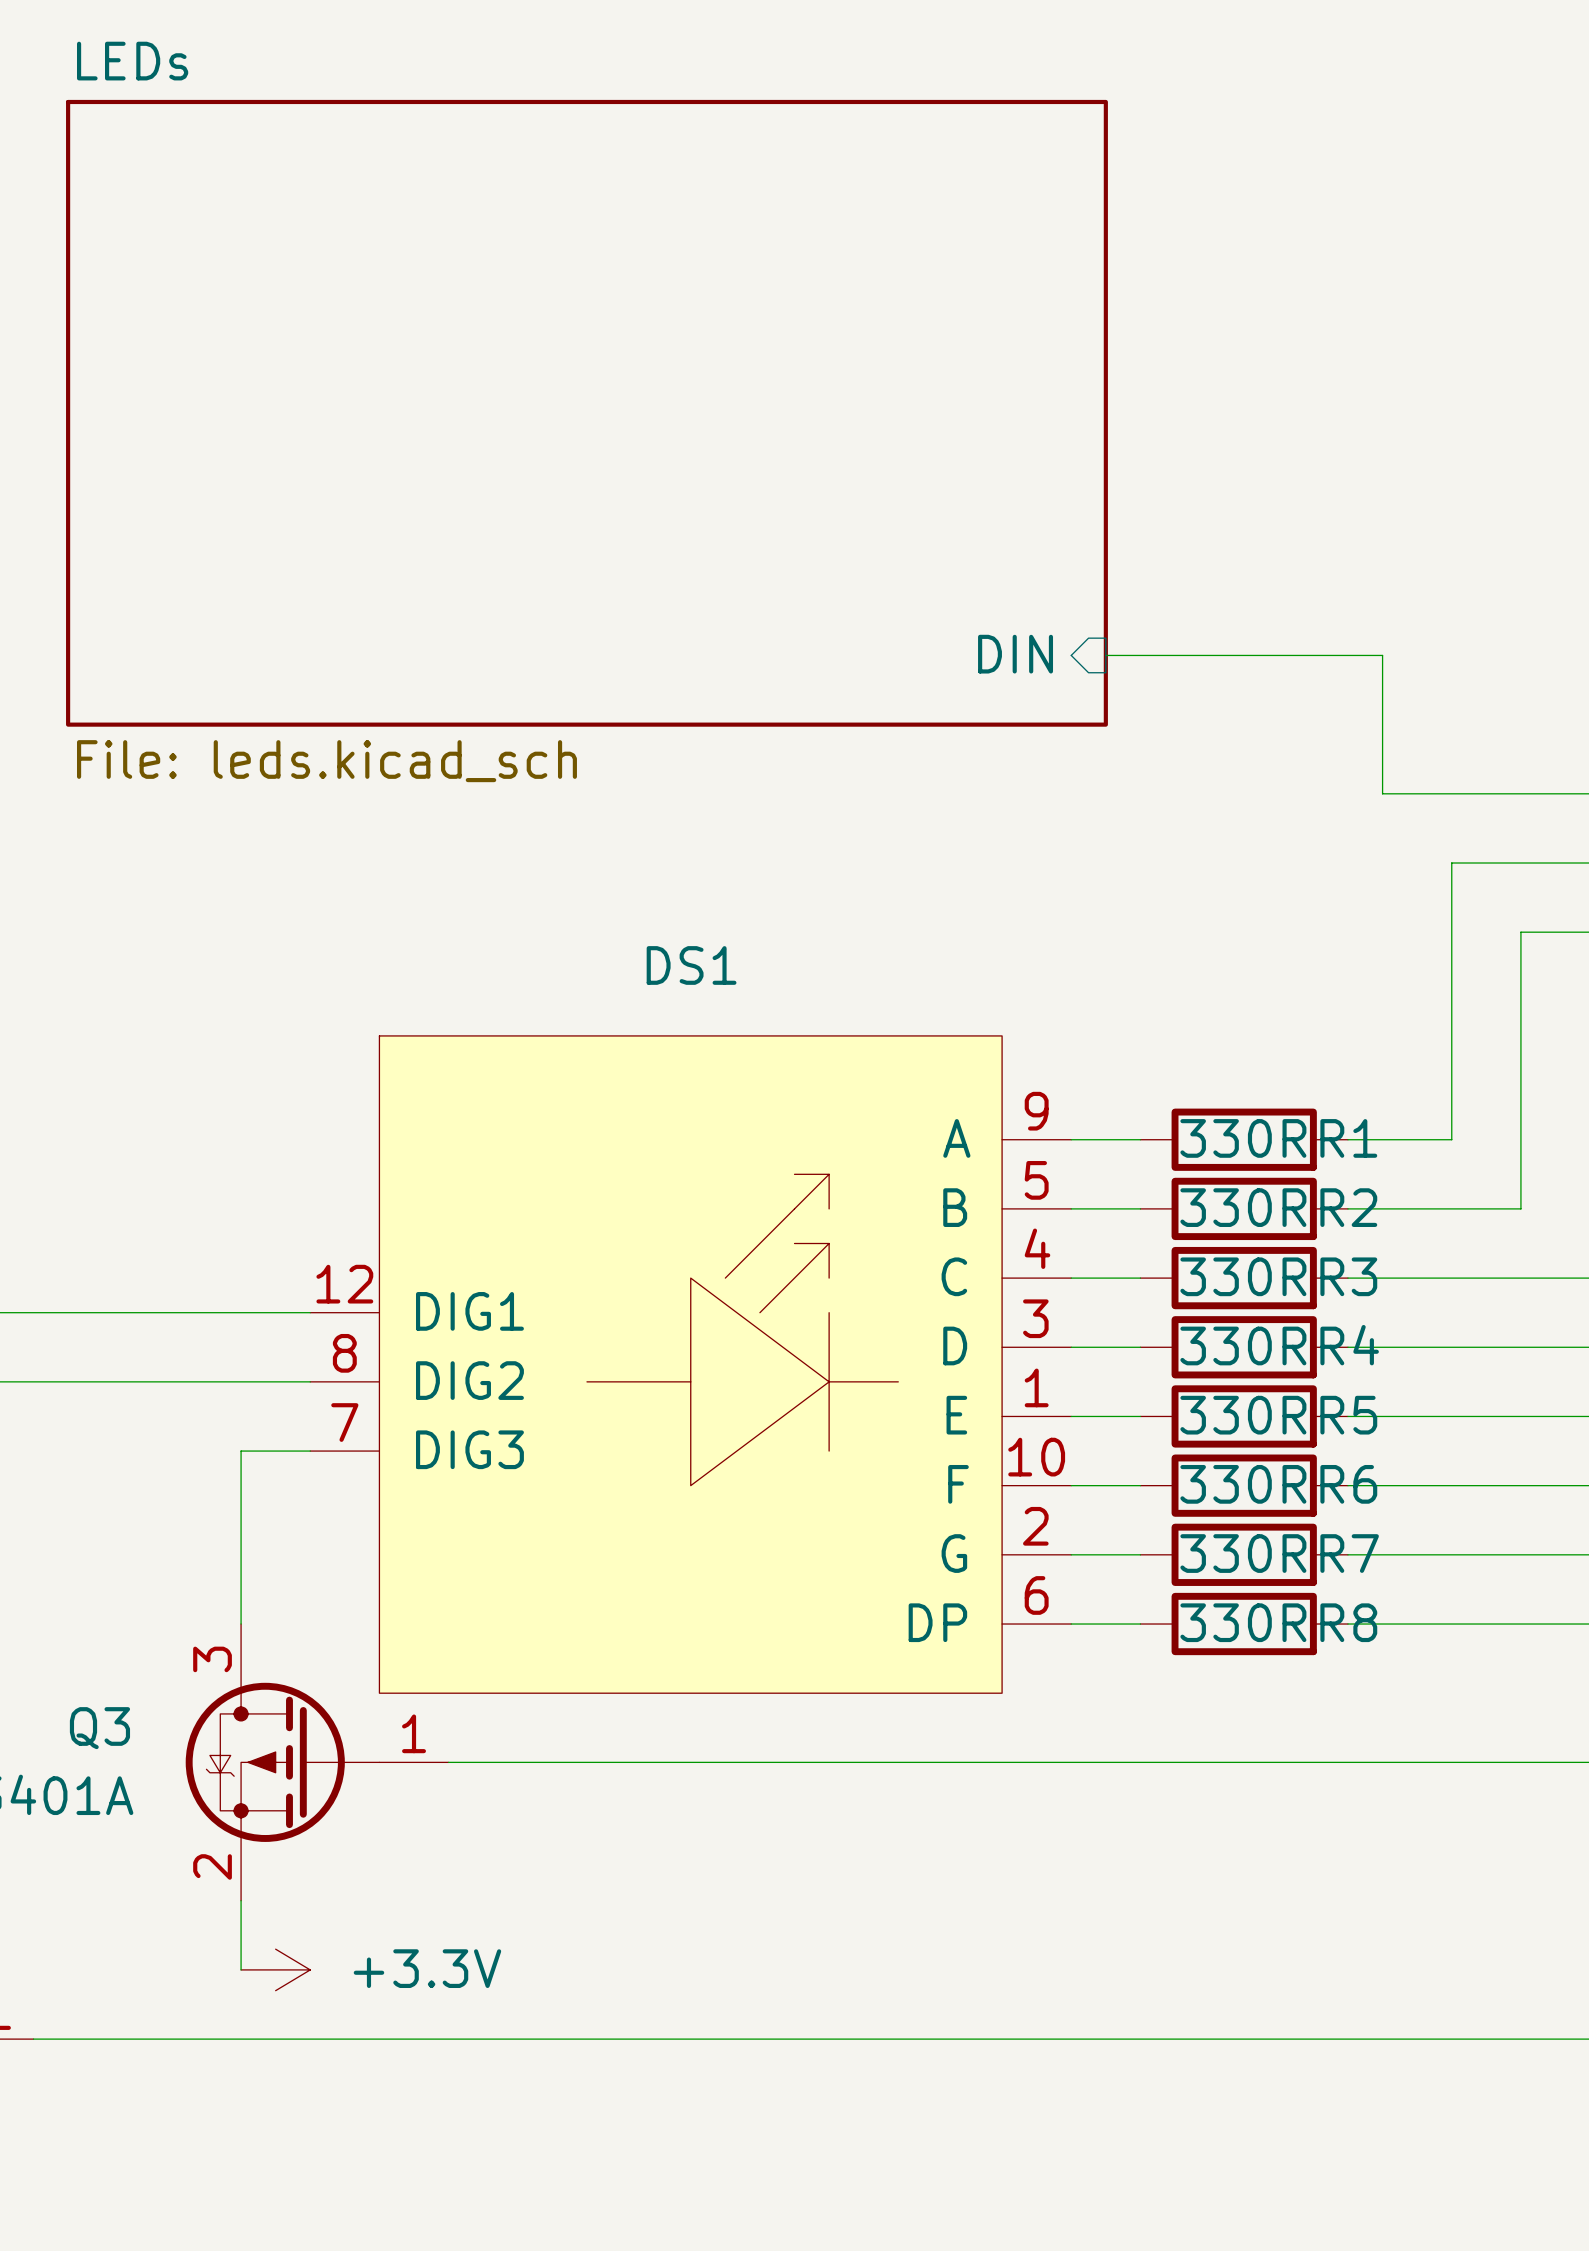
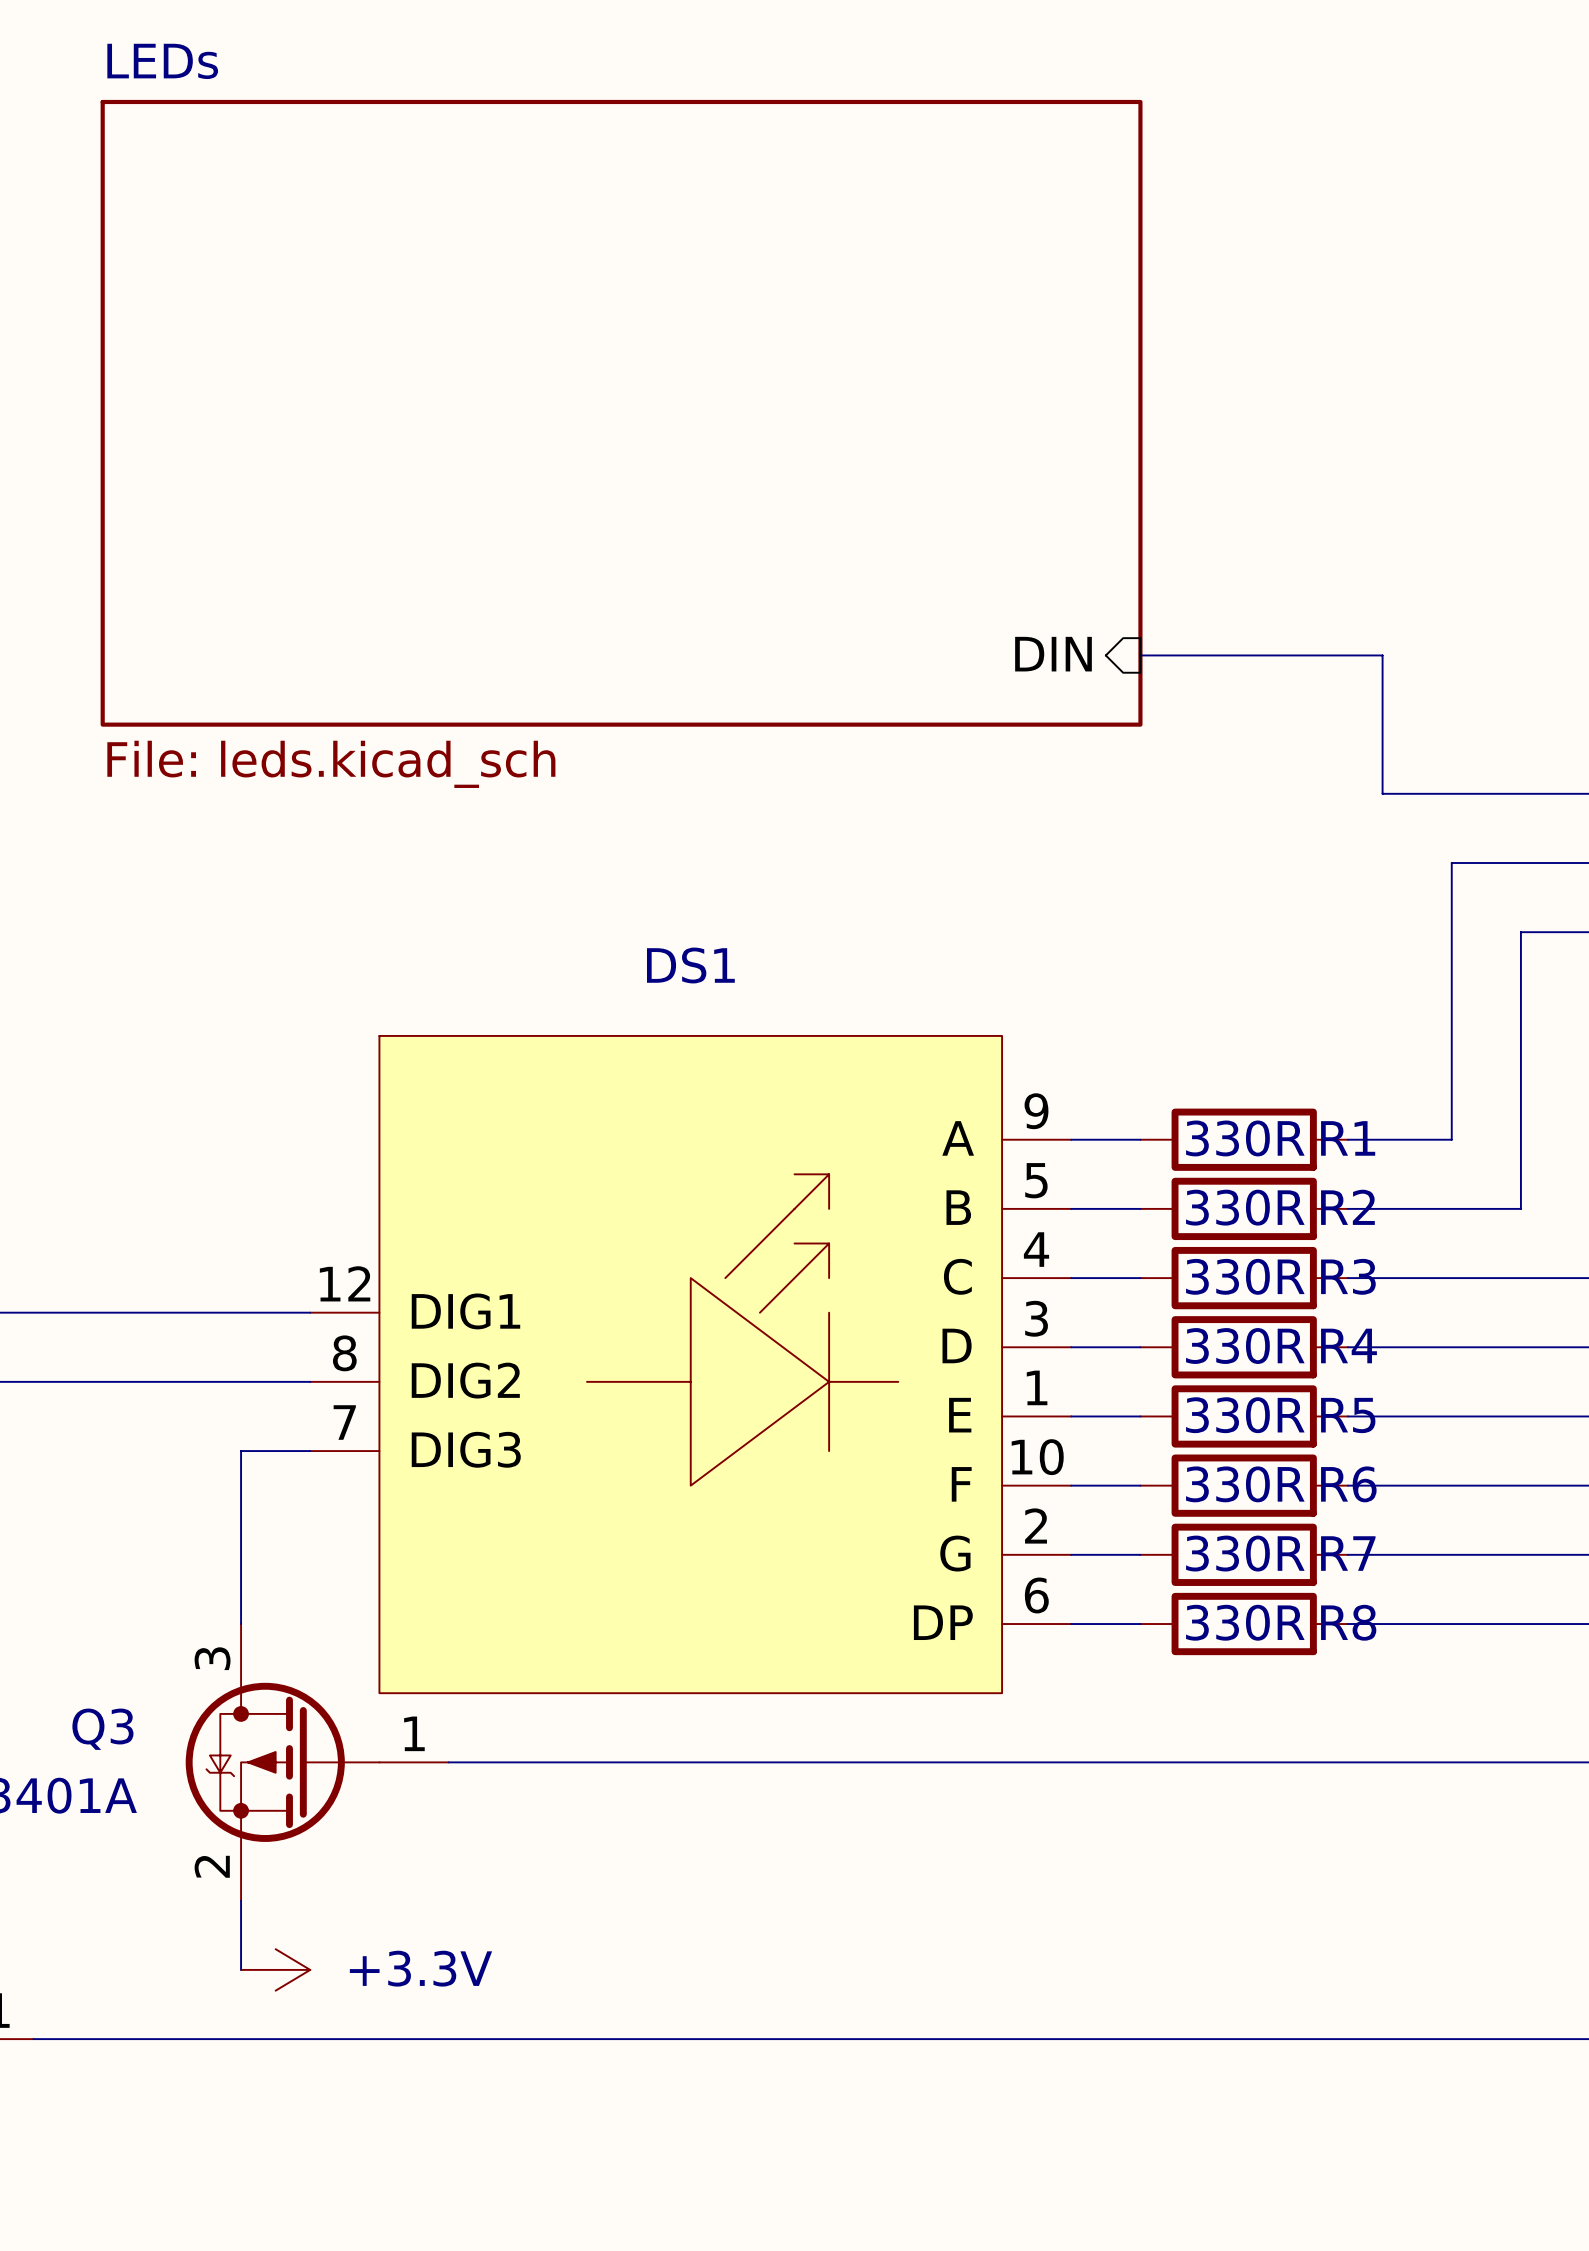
sheet LEDs position: (586, 413) -> (621, 413)
sheet pin position: DIN (1015, 654) -> DIN (1053, 654)
wire: (1105, 655) (1140, 655) -> none

